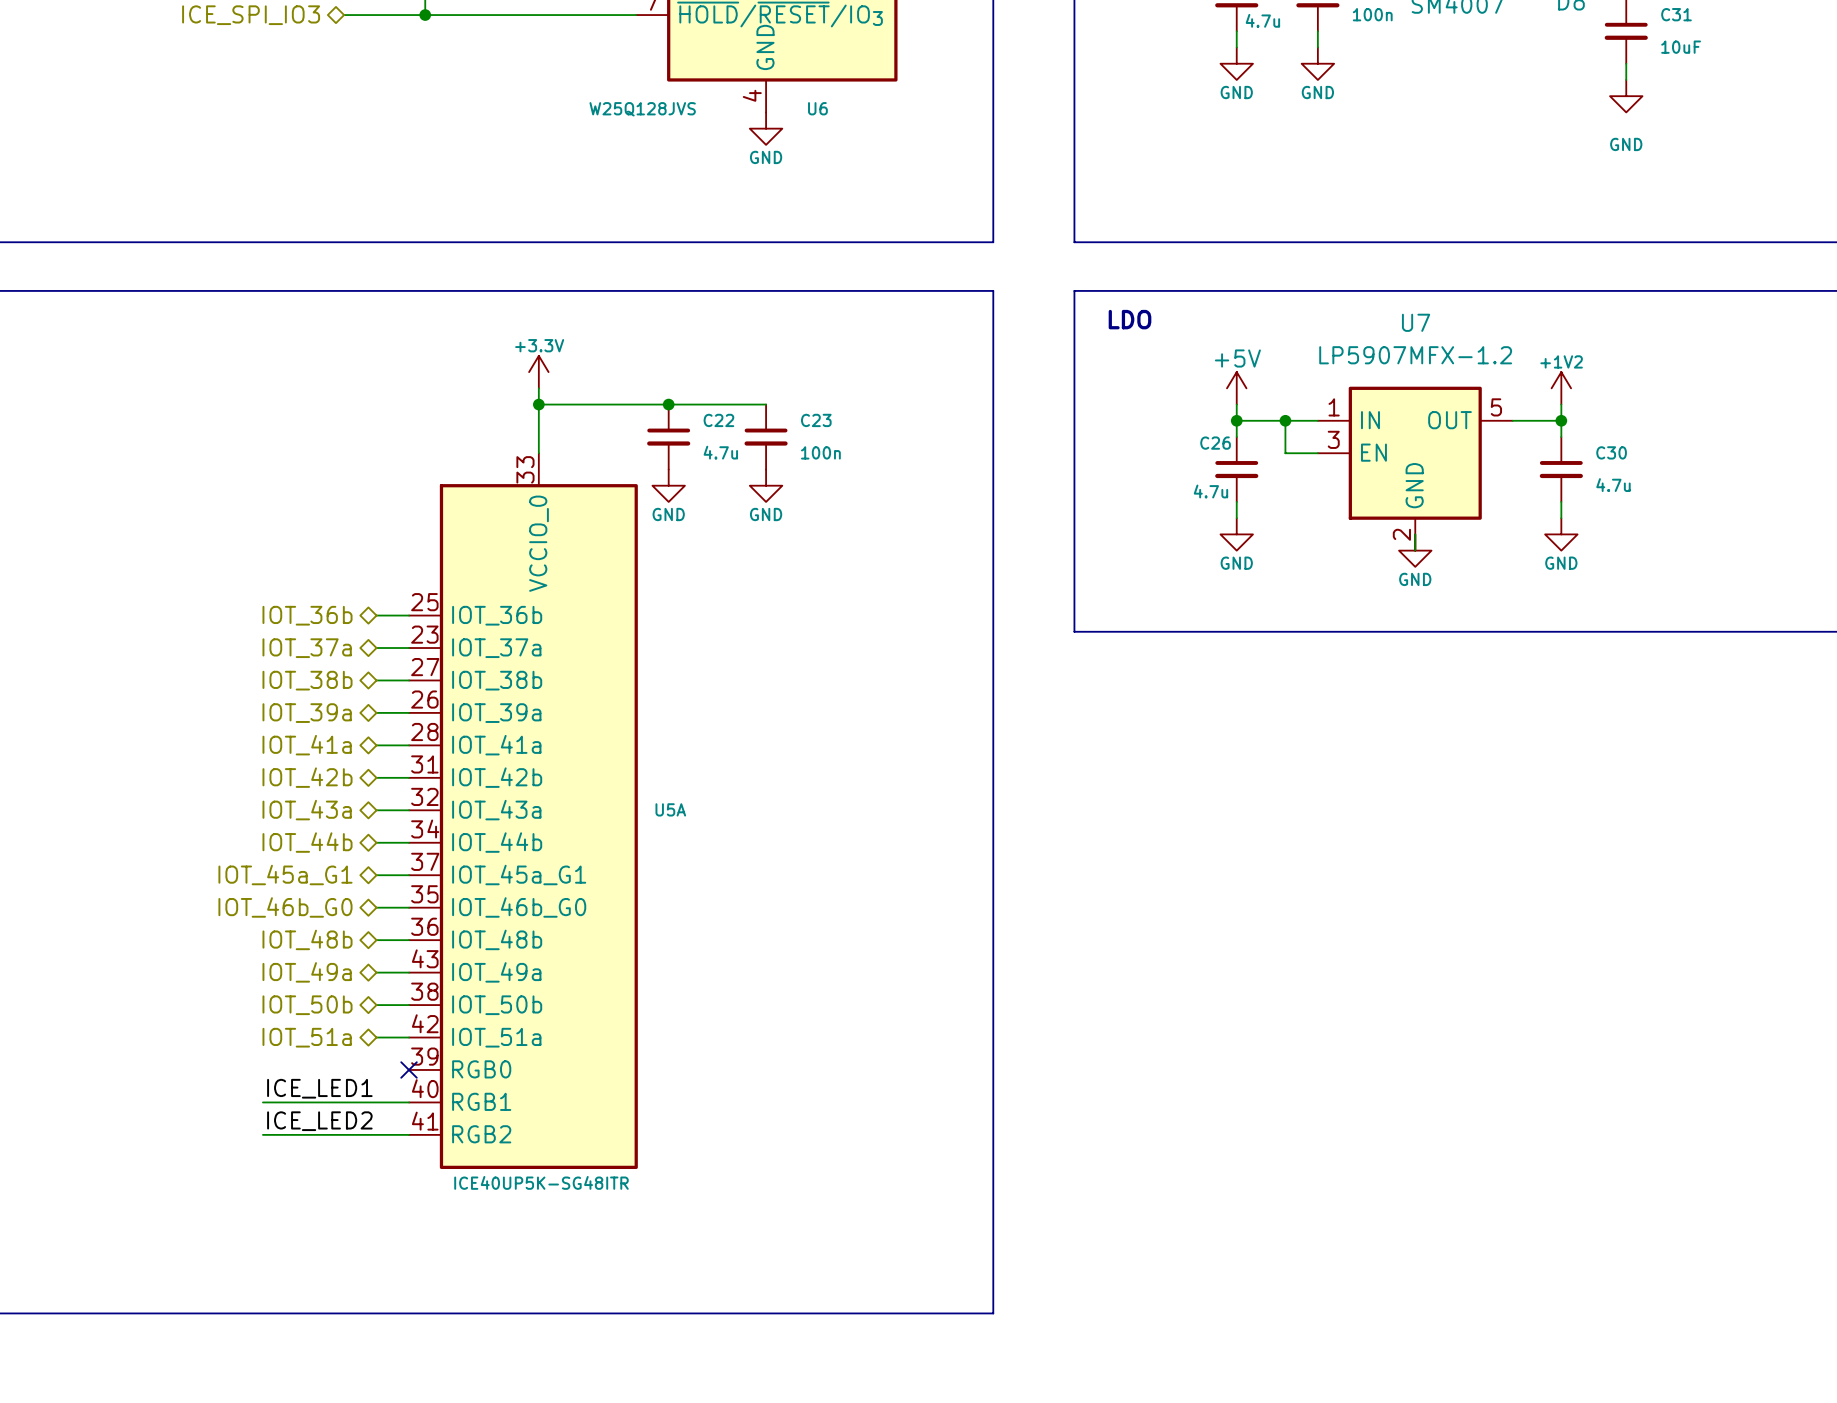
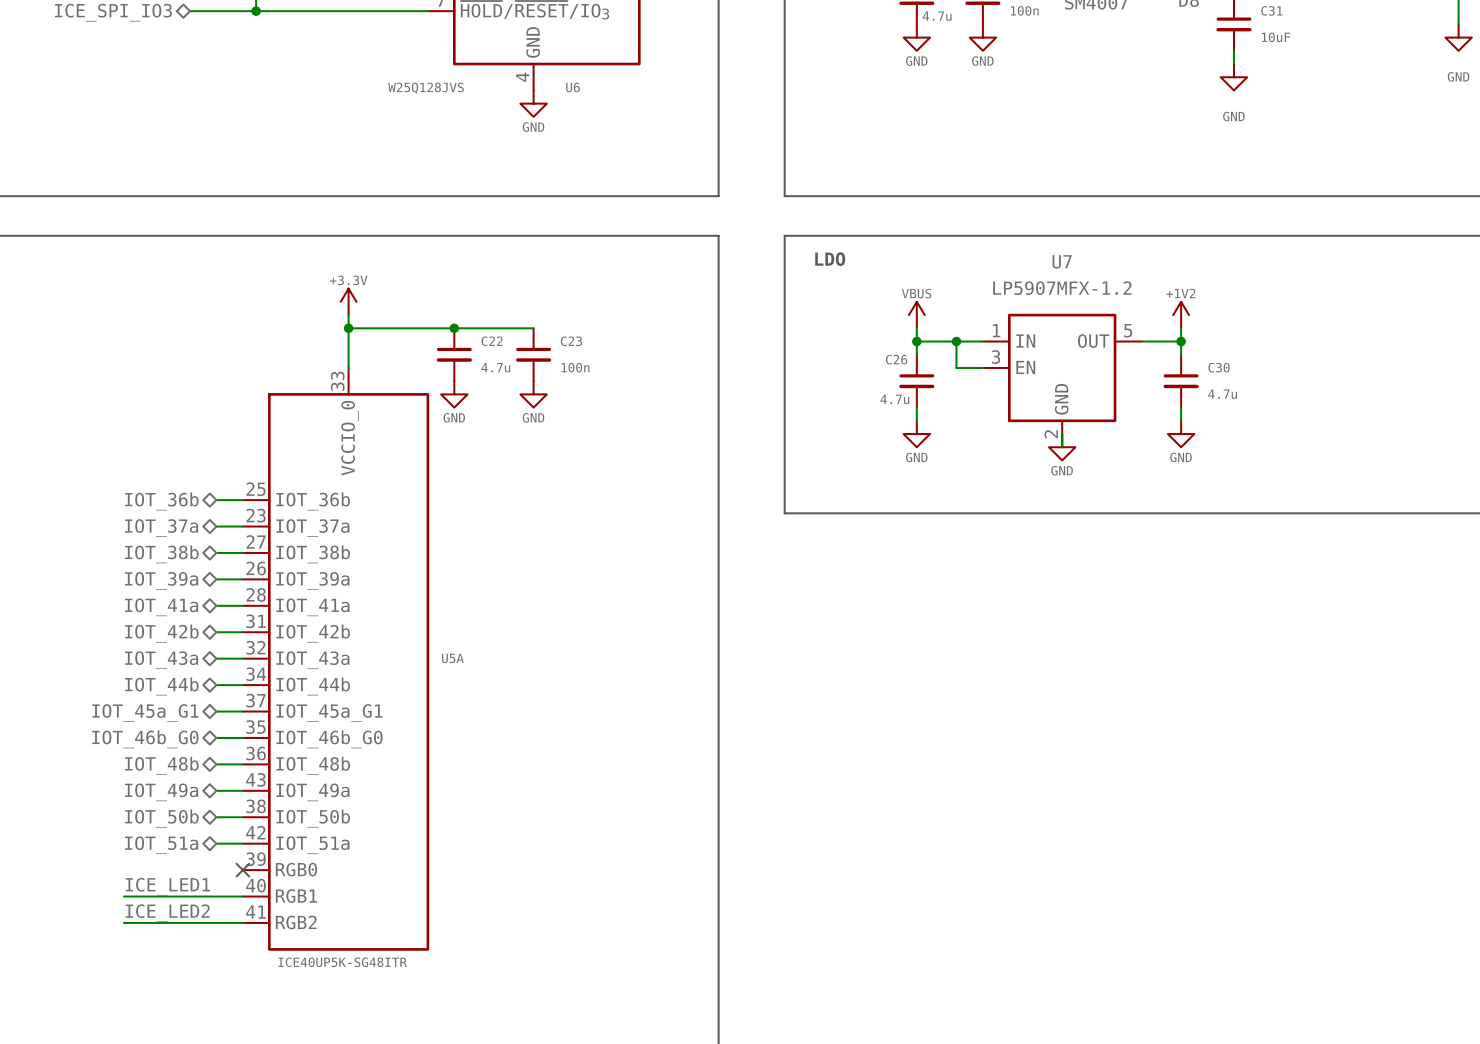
power symbol position: GND (1236, 63) -> GND (916, 37)
power symbol position: GND (1317, 63) -> GND (982, 37)
power symbol: +5V (1236, 388) -> VBUS (916, 315)

